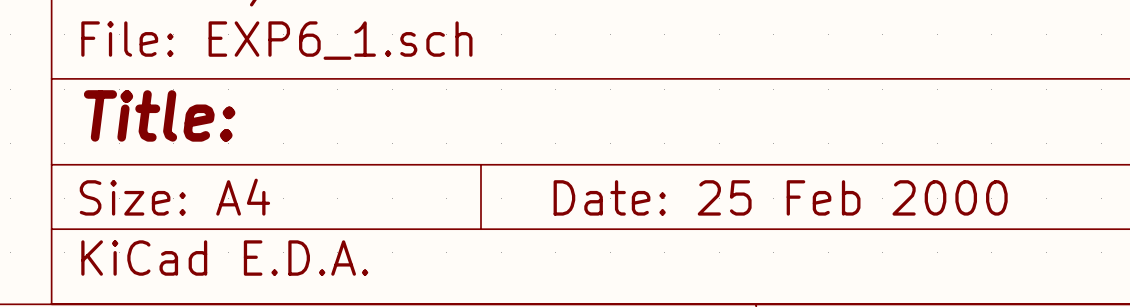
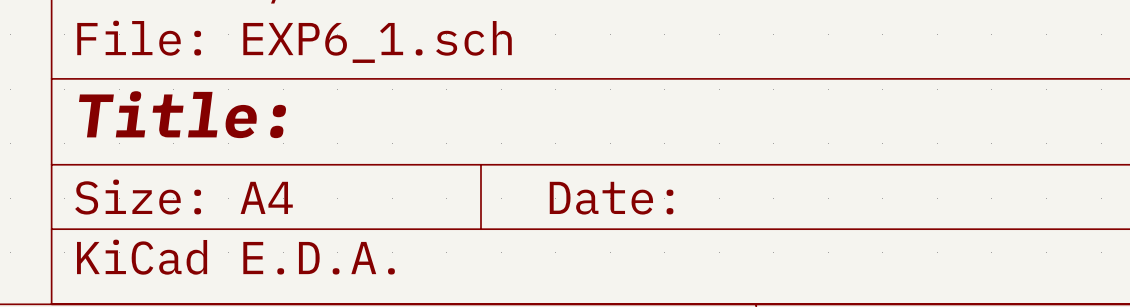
title block: Date: 25 Feb 2000 (780, 197) -> Date: (611, 198)

